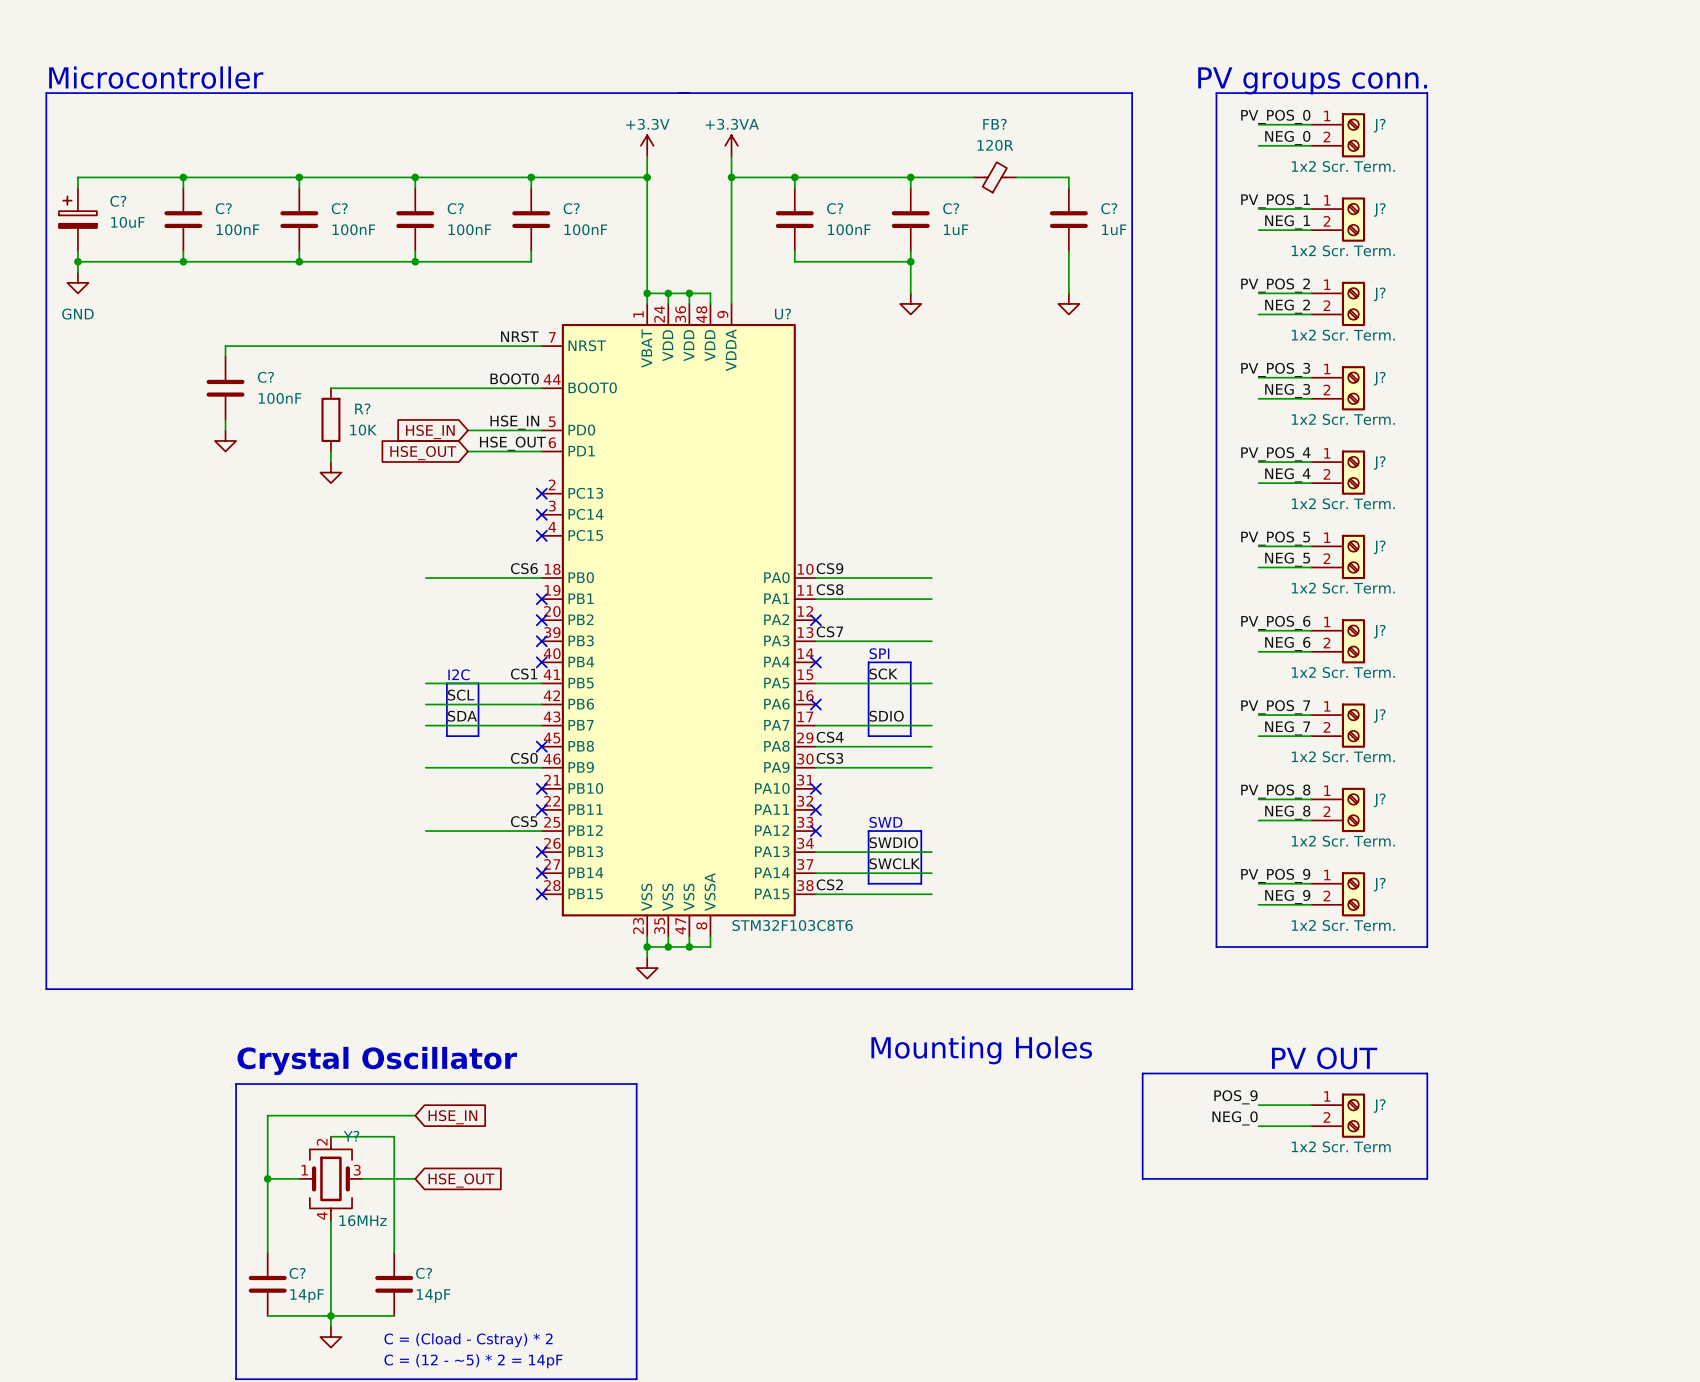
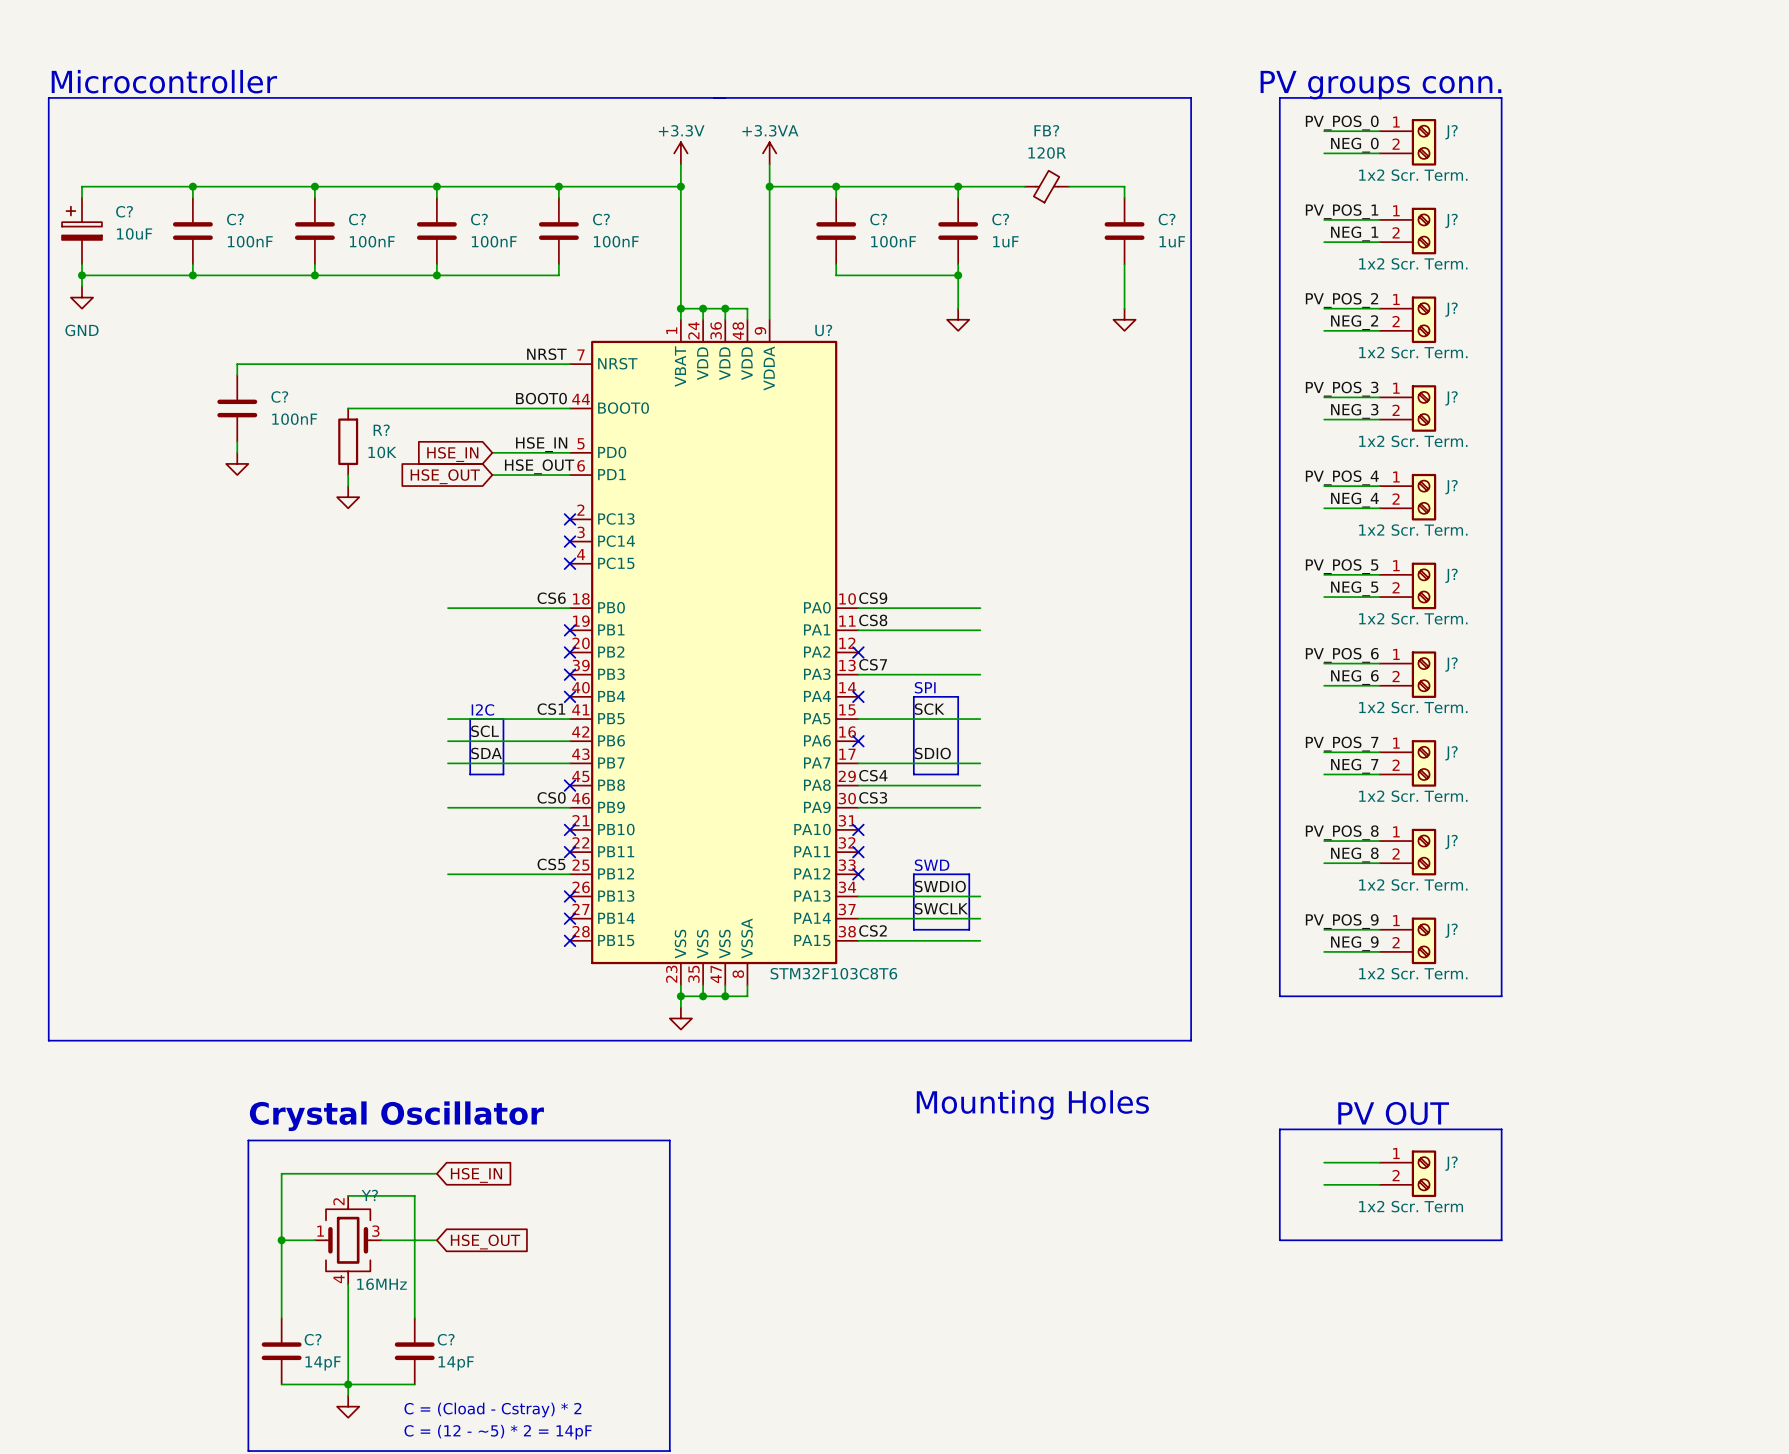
line: (1216, 1073) (1142, 1073) (1142, 1178) (1216, 1178) -> (1279, 1129) (1279, 1240)
label: POS_9 (1235, 1097) -> none
label: NEG_0 (1235, 1118) -> none

